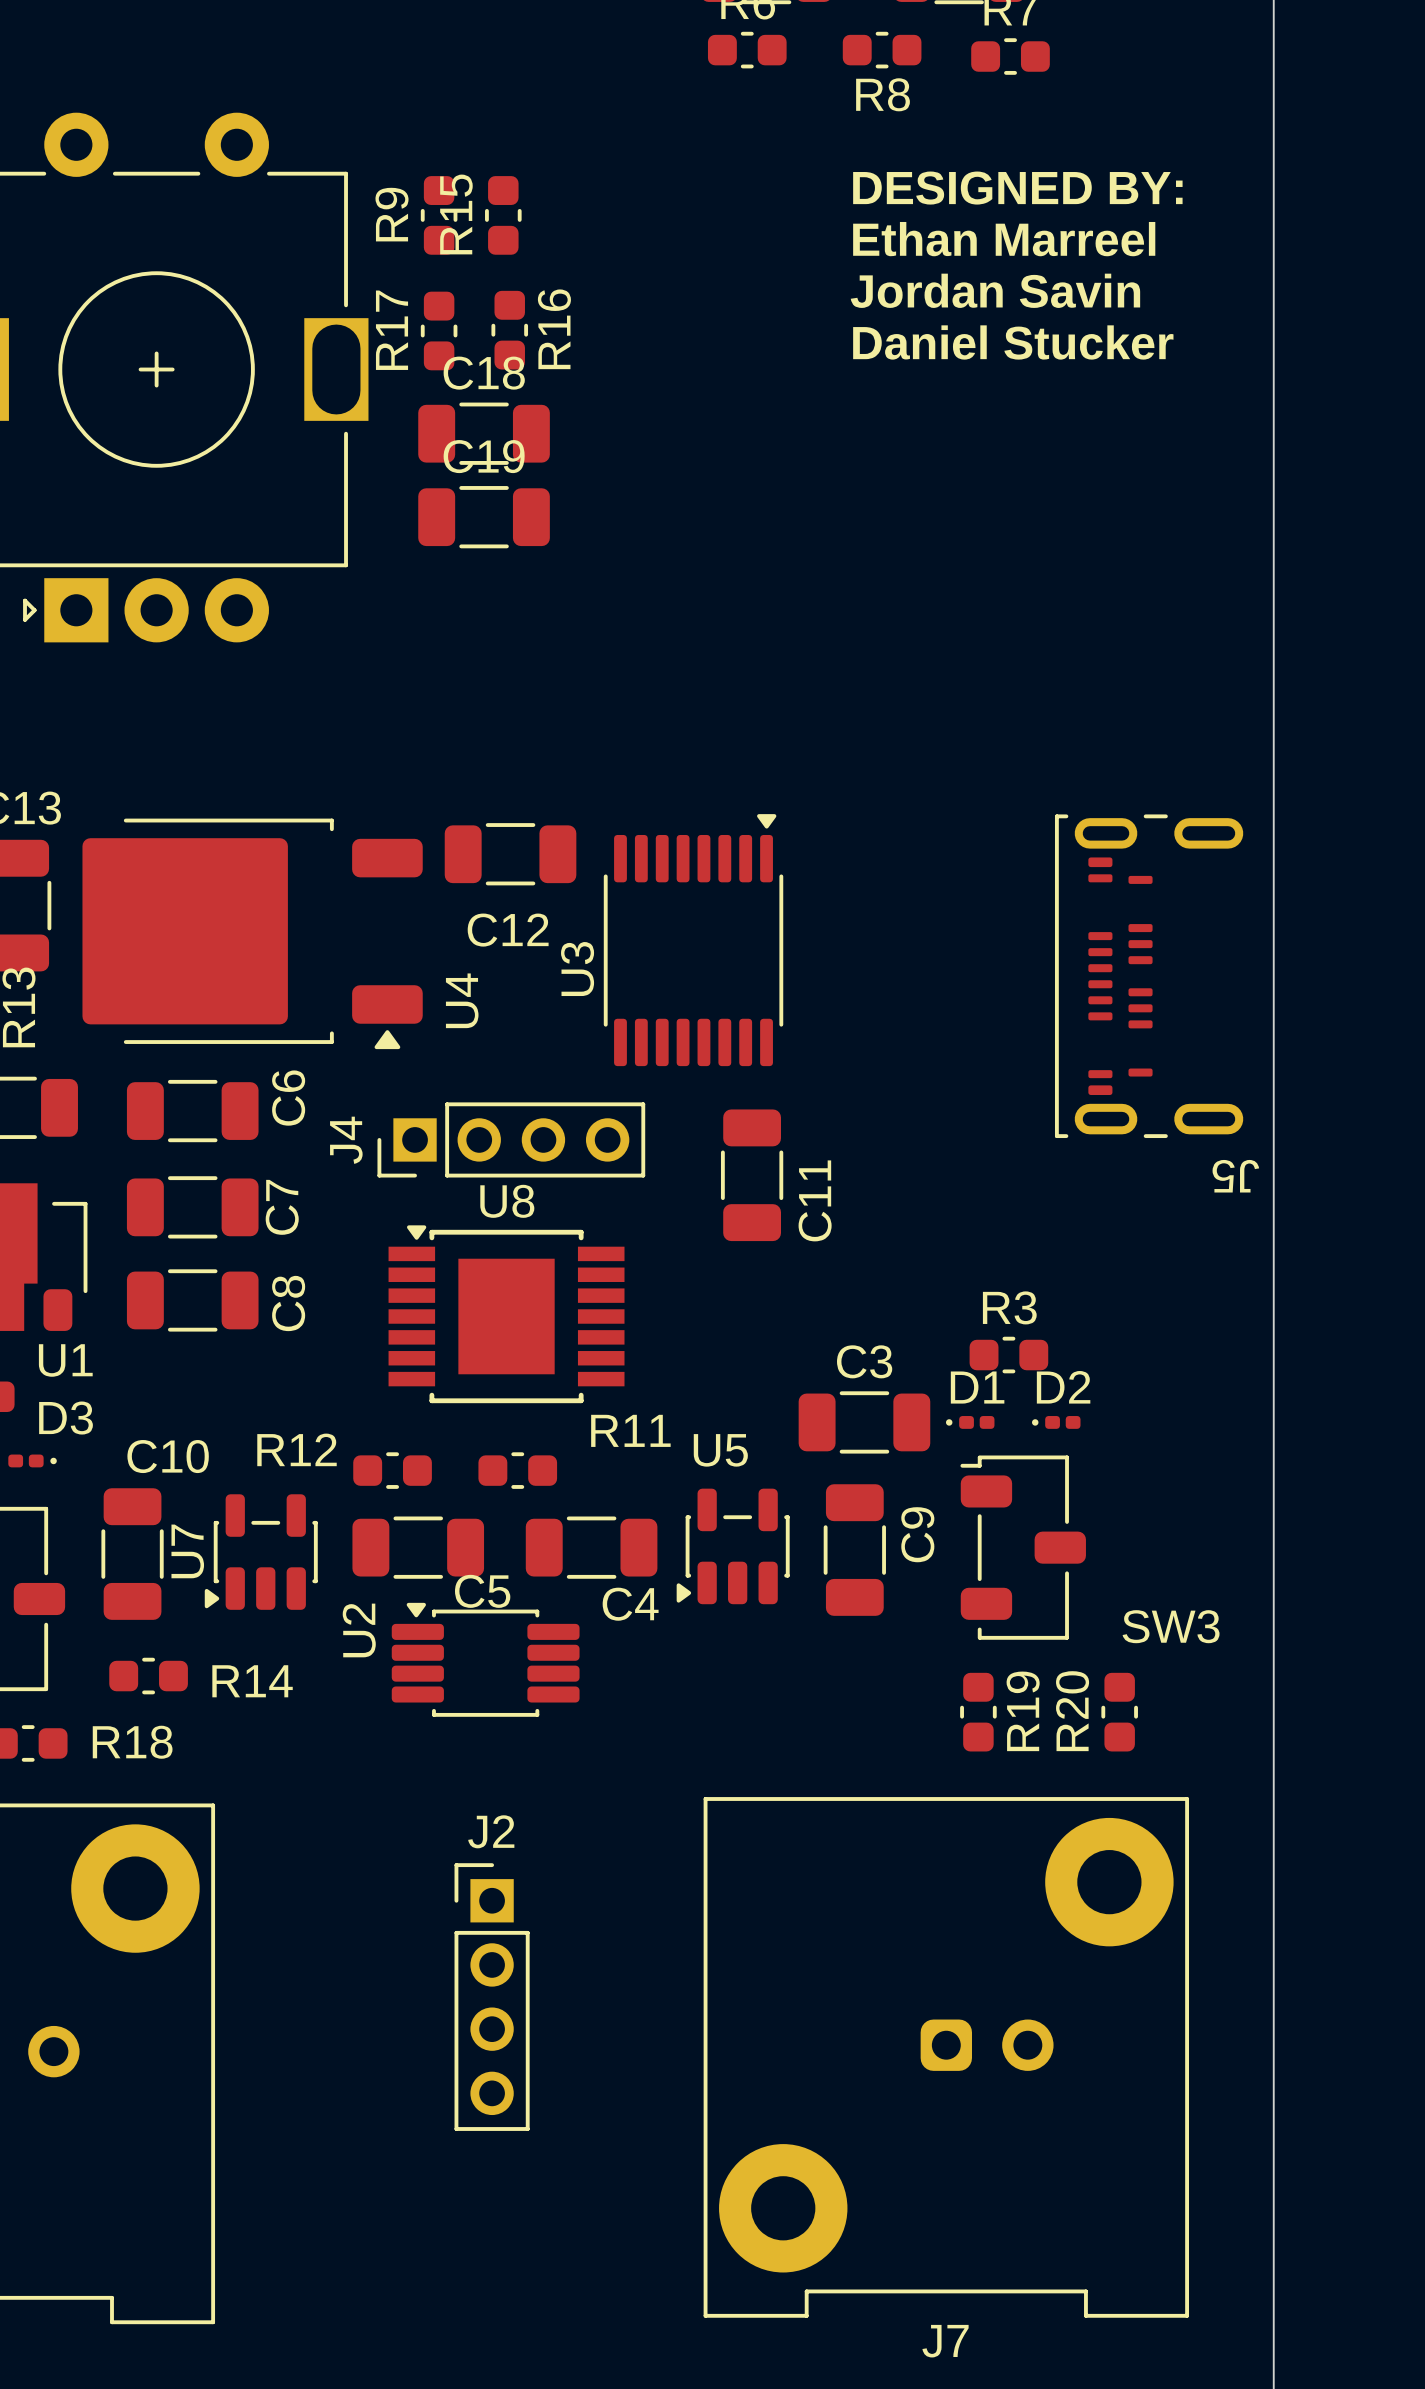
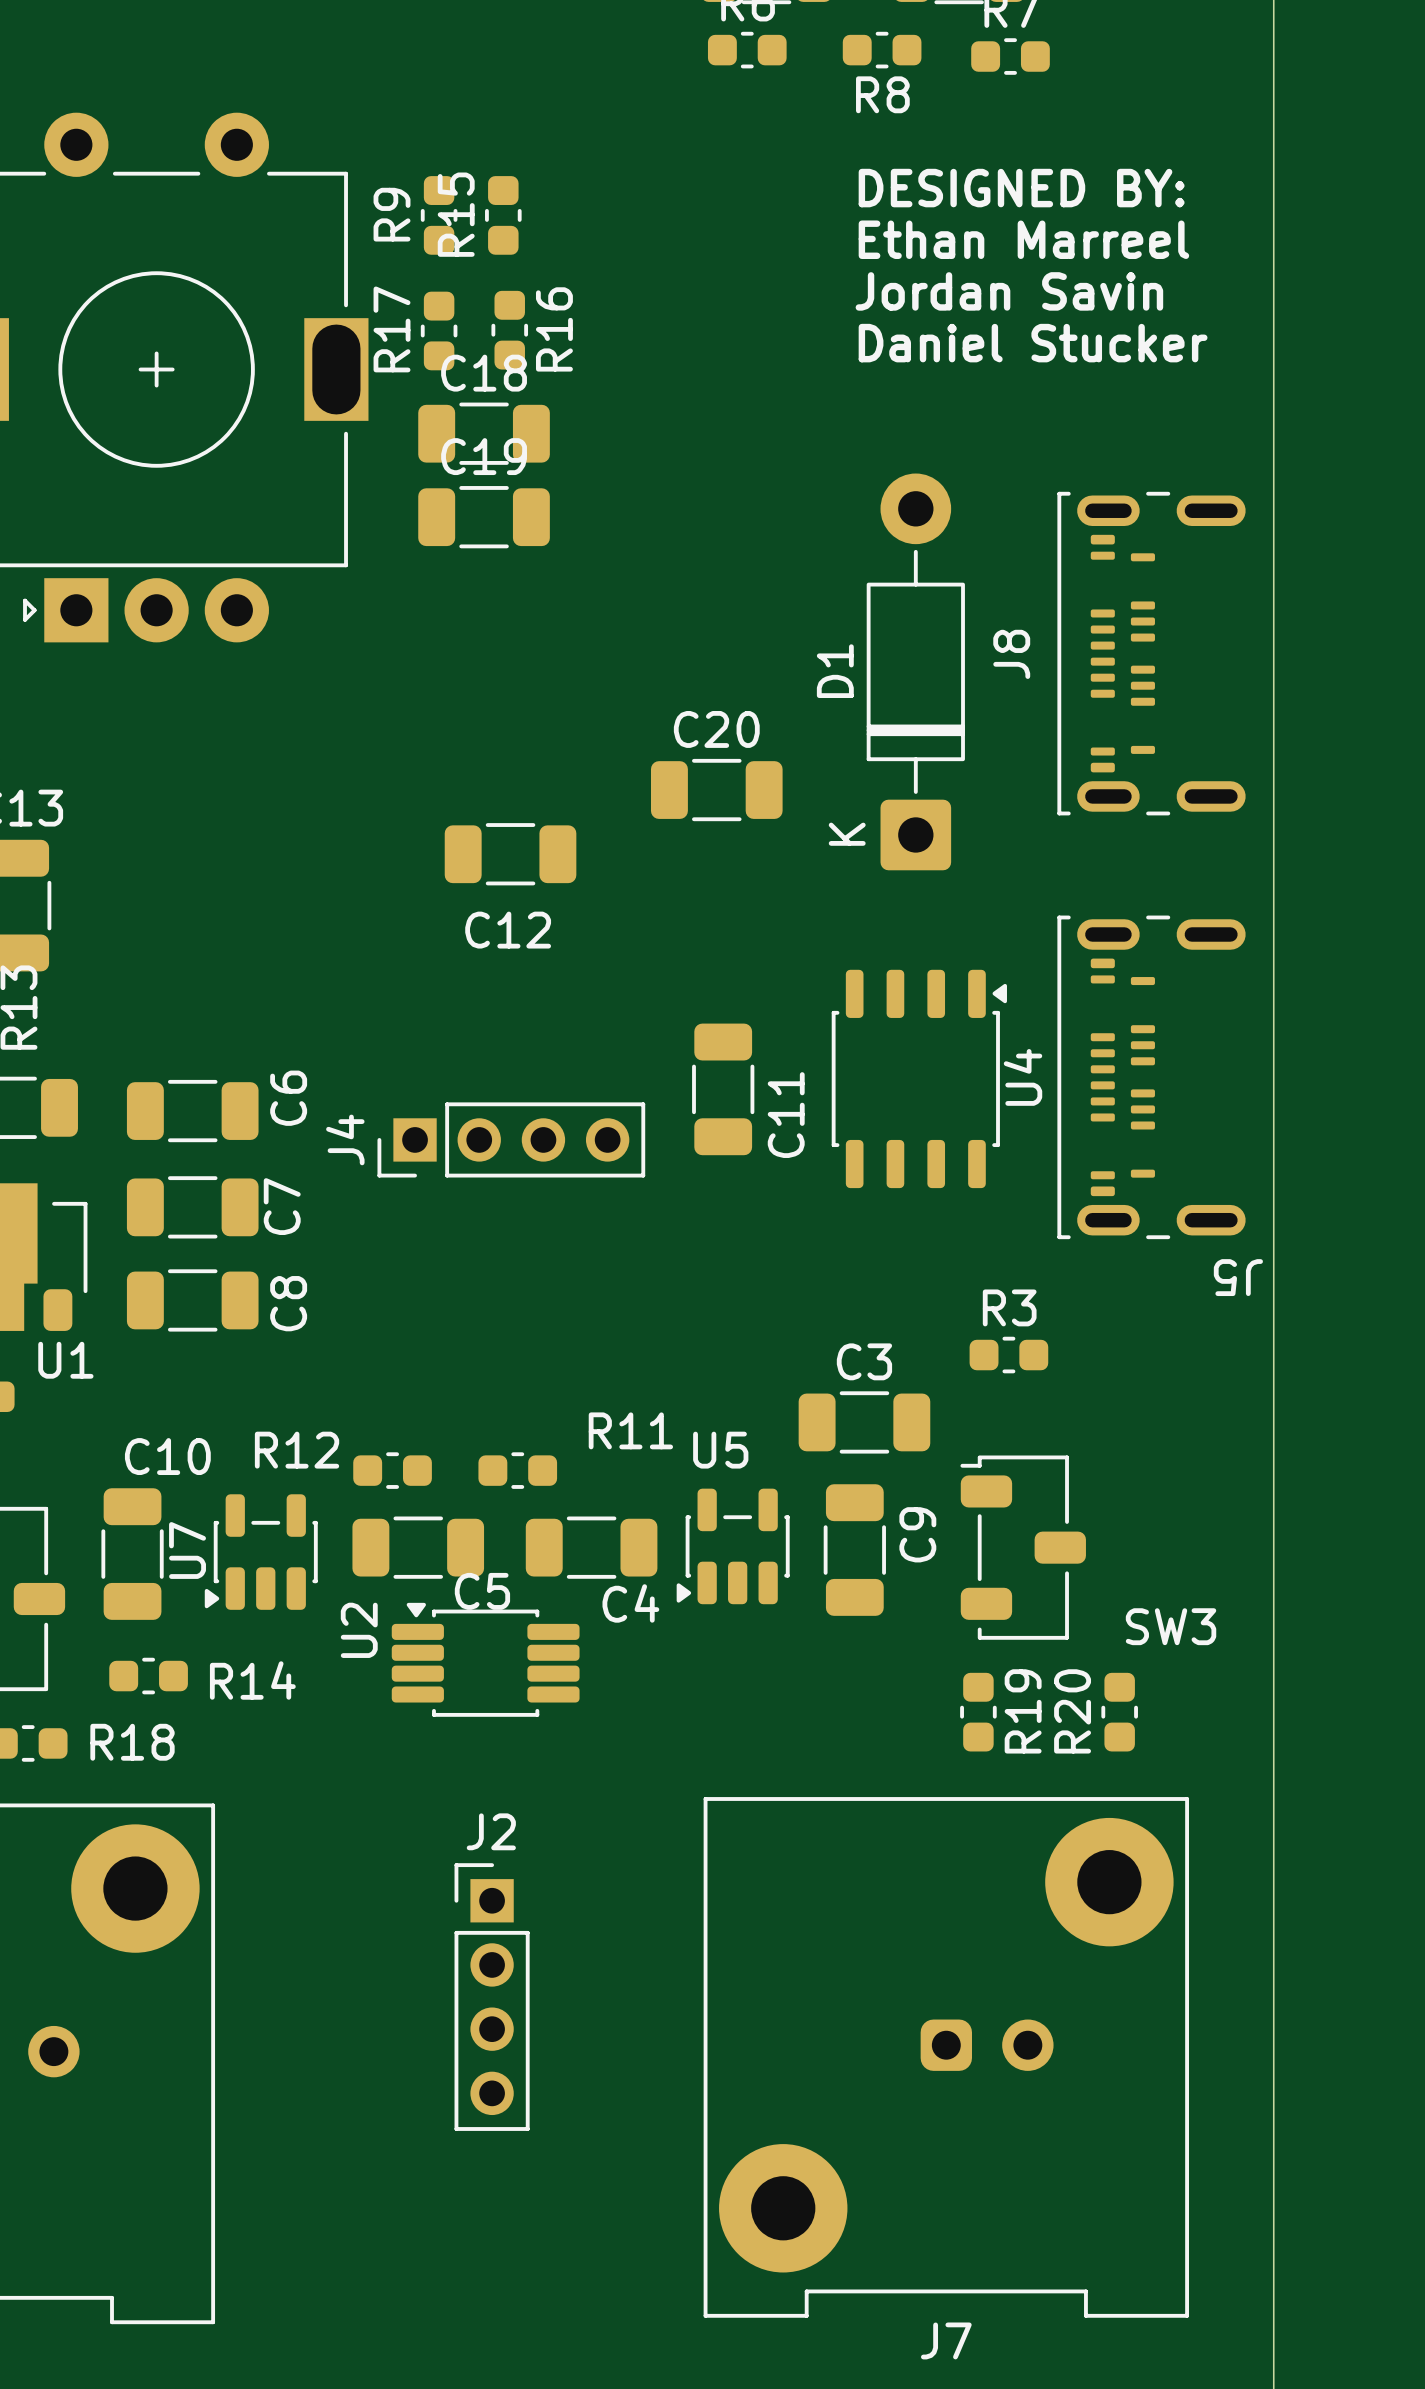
J8: none -> (1151, 653)
C20: none -> (716, 790)
U4 footprint: [82, 818, 423, 1050] -> [831, 969, 1007, 1189]
U3: (693, 940) -> none
J5 position: (1149, 976) -> (1151, 1077)
U4 name position: U4 (462, 1000) -> U4 (1023, 1077)
C11 position: (752, 1175) -> (723, 1089)
U8: (506, 1314) -> none
D1 name position: D1 (977, 1387) -> D1 (835, 671)
D1 footprint: [945, 1416, 995, 1429] -> [866, 473, 965, 871]
D2: (1056, 1422) -> none
D3: (32, 1460) -> none

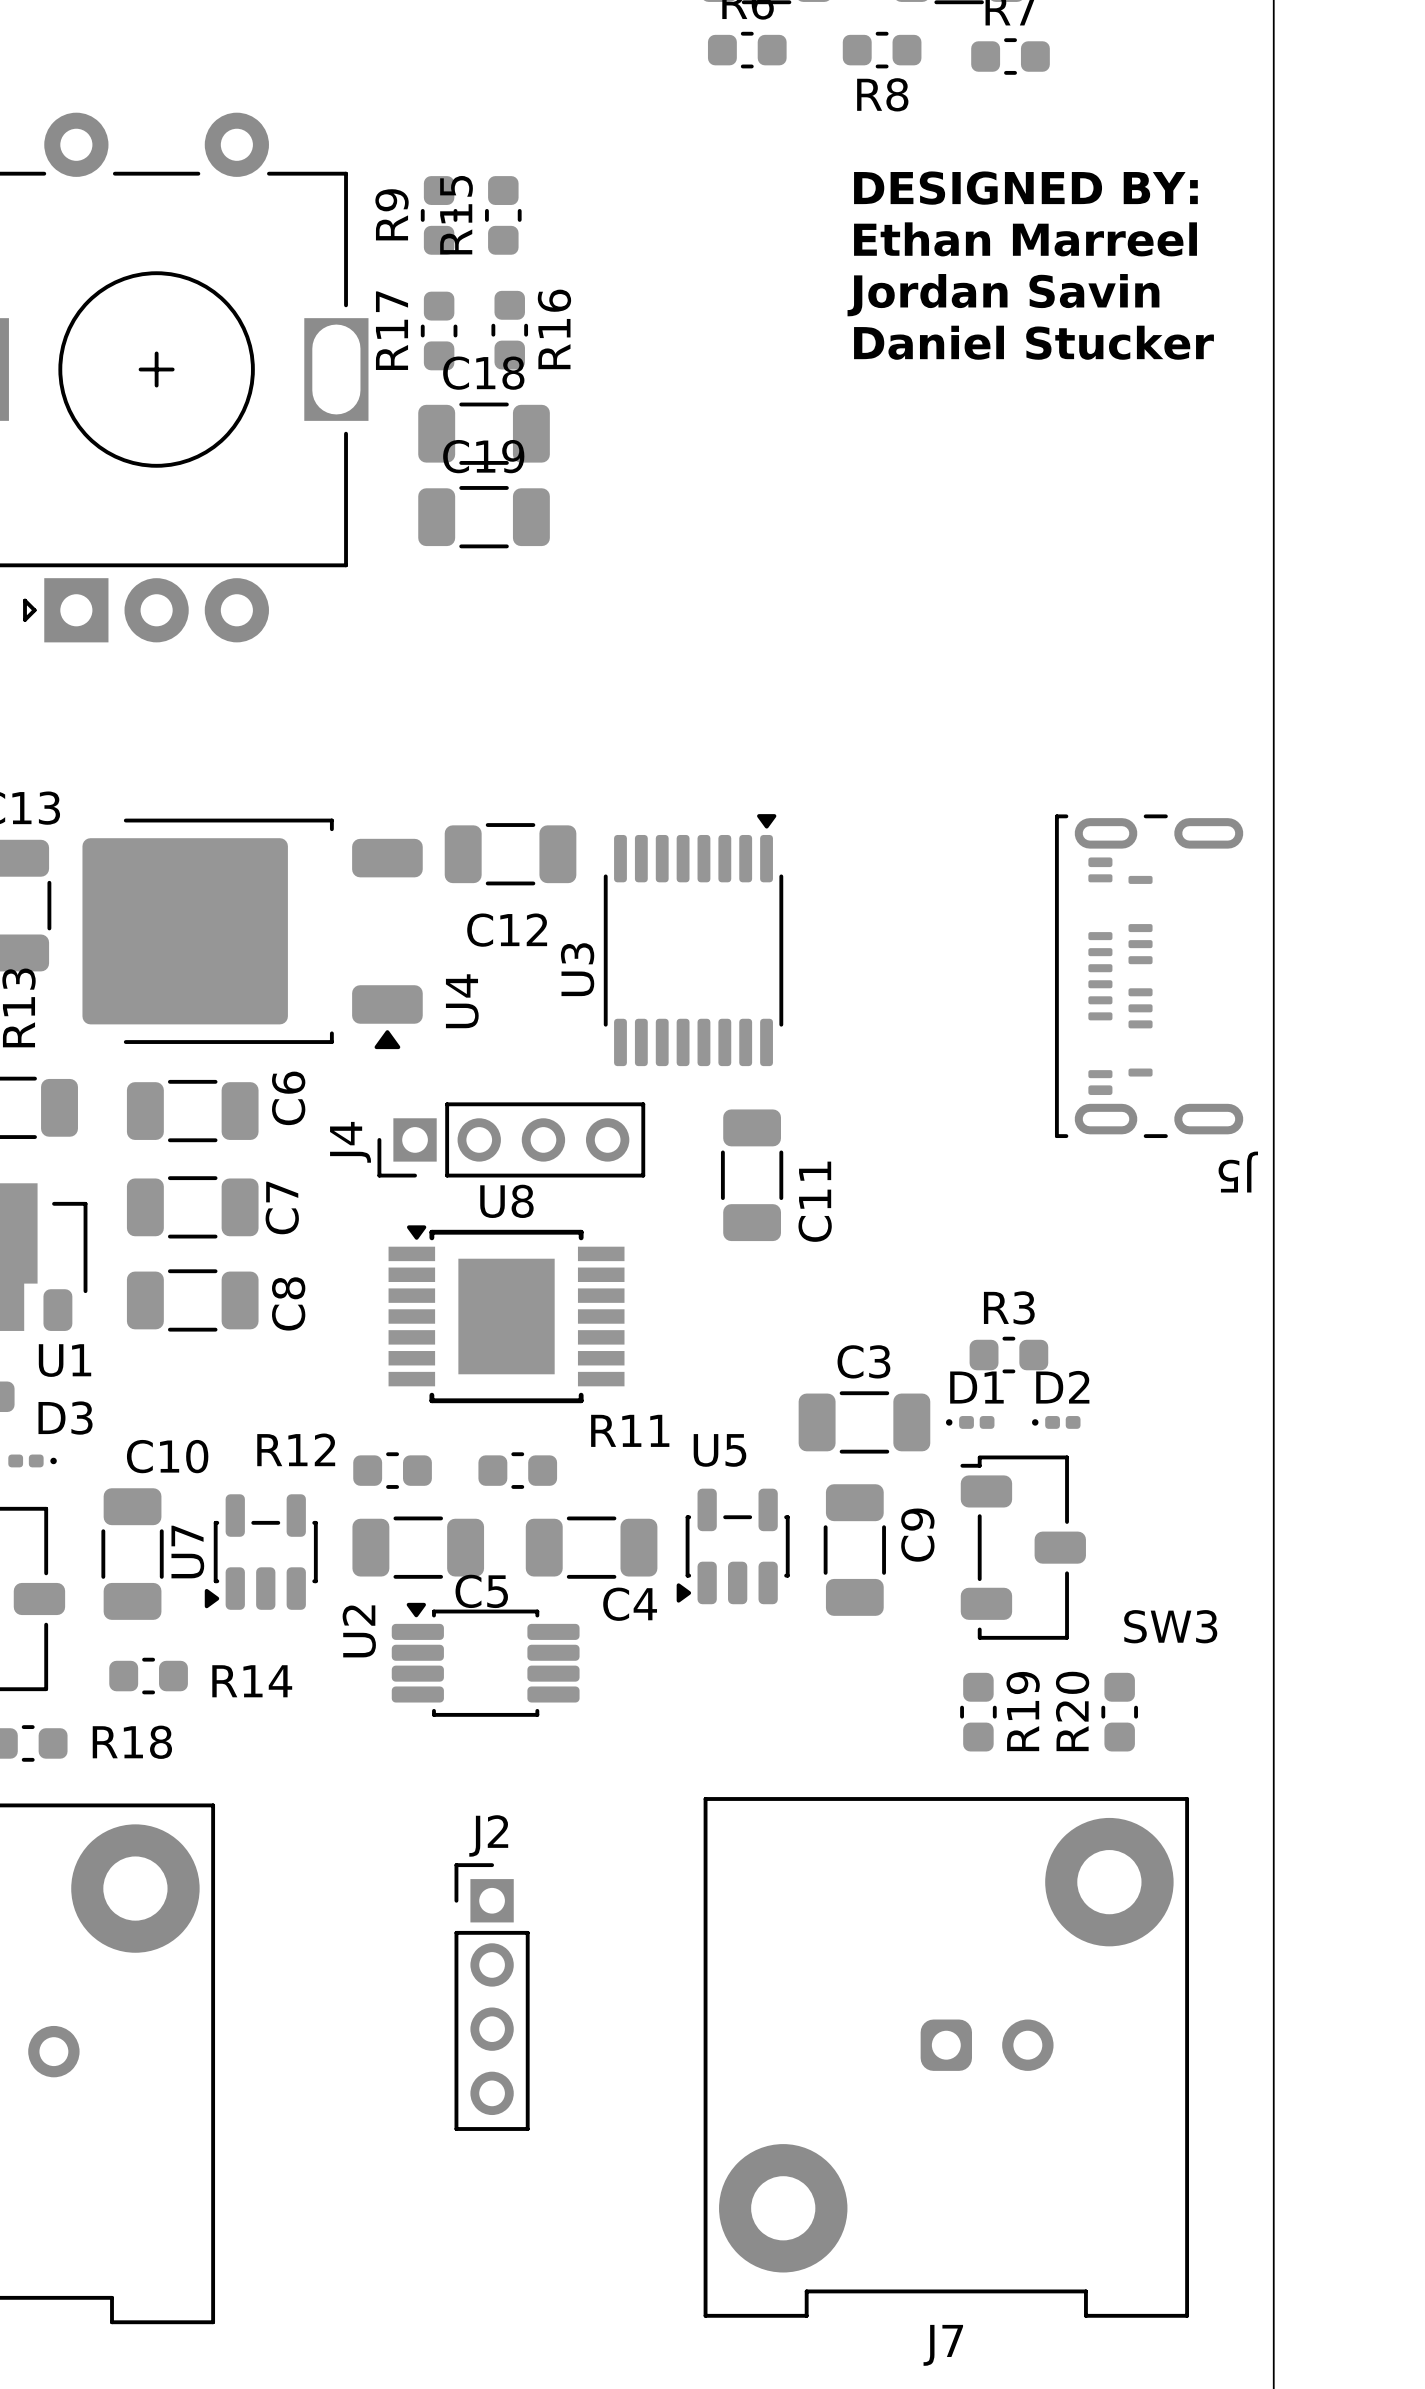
D1 footprint: [866, 473, 965, 871] -> [945, 1416, 995, 1429]
J8: (1151, 653) -> none
D1 name position: D1 (835, 671) -> D1 (976, 1387)
C20: (716, 790) -> none
U3: none -> (693, 940)
U4 footprint: [831, 969, 1007, 1189] -> [82, 818, 423, 1050]
U4 name position: U4 (1023, 1077) -> U4 (462, 1001)
J5 position: (1151, 1077) -> (1149, 976)
C11 position: (723, 1089) -> (752, 1175)
U8: none -> (506, 1314)
D2: none -> (1056, 1422)
D3: none -> (32, 1460)

